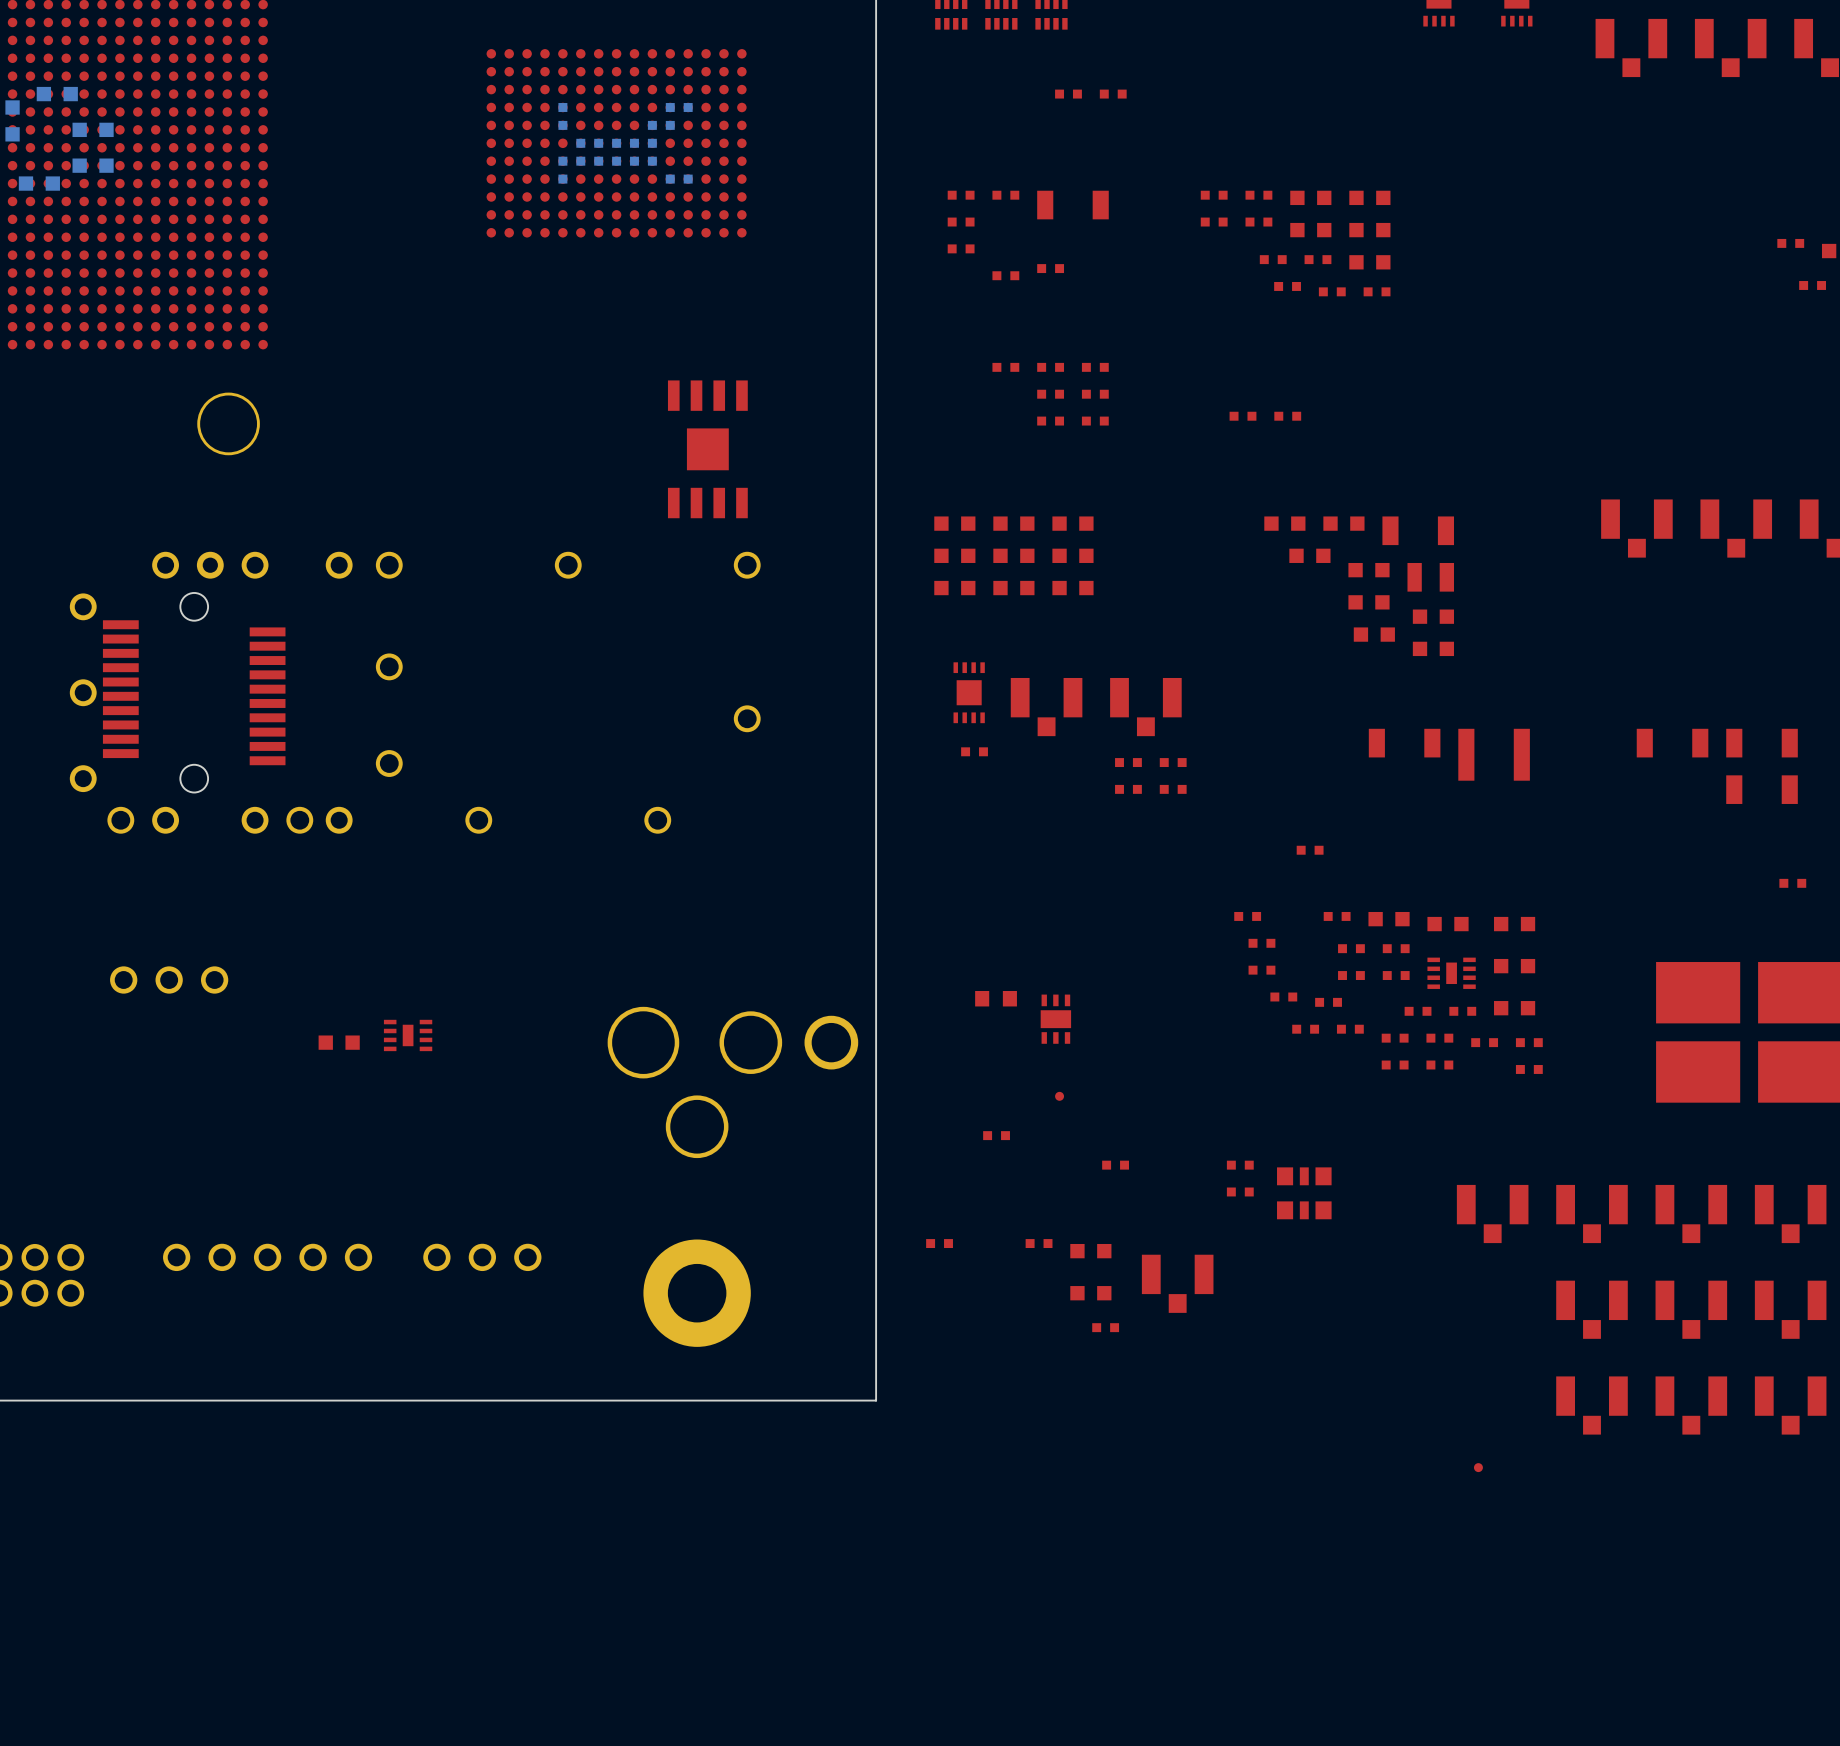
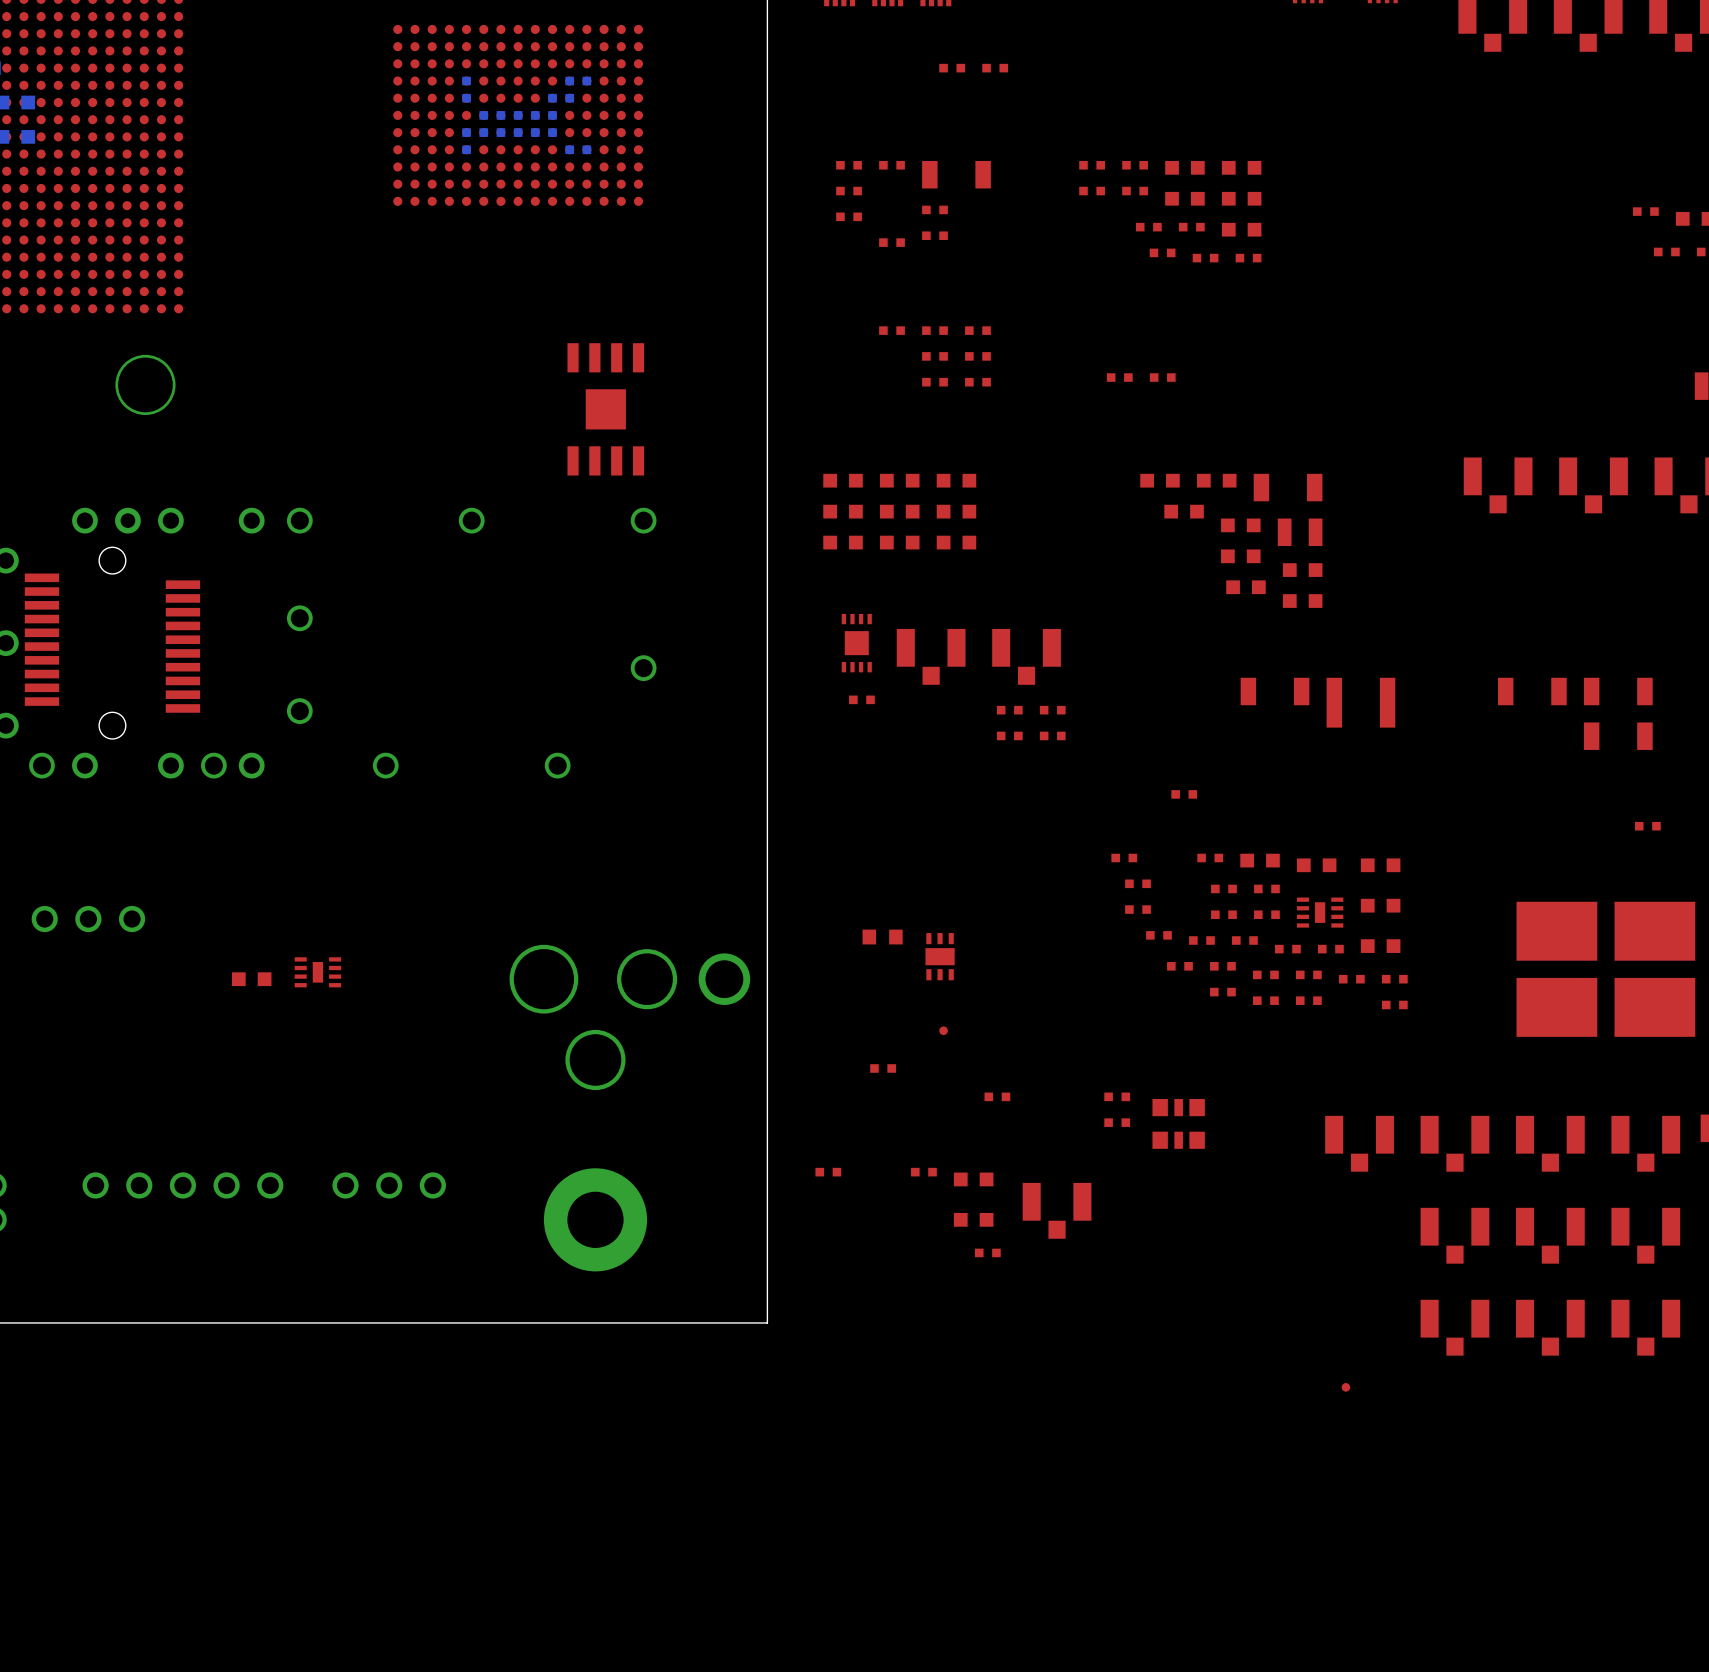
part: none -> (934, 209)
part: none -> (1244, 940)
part: none -> (1222, 992)

